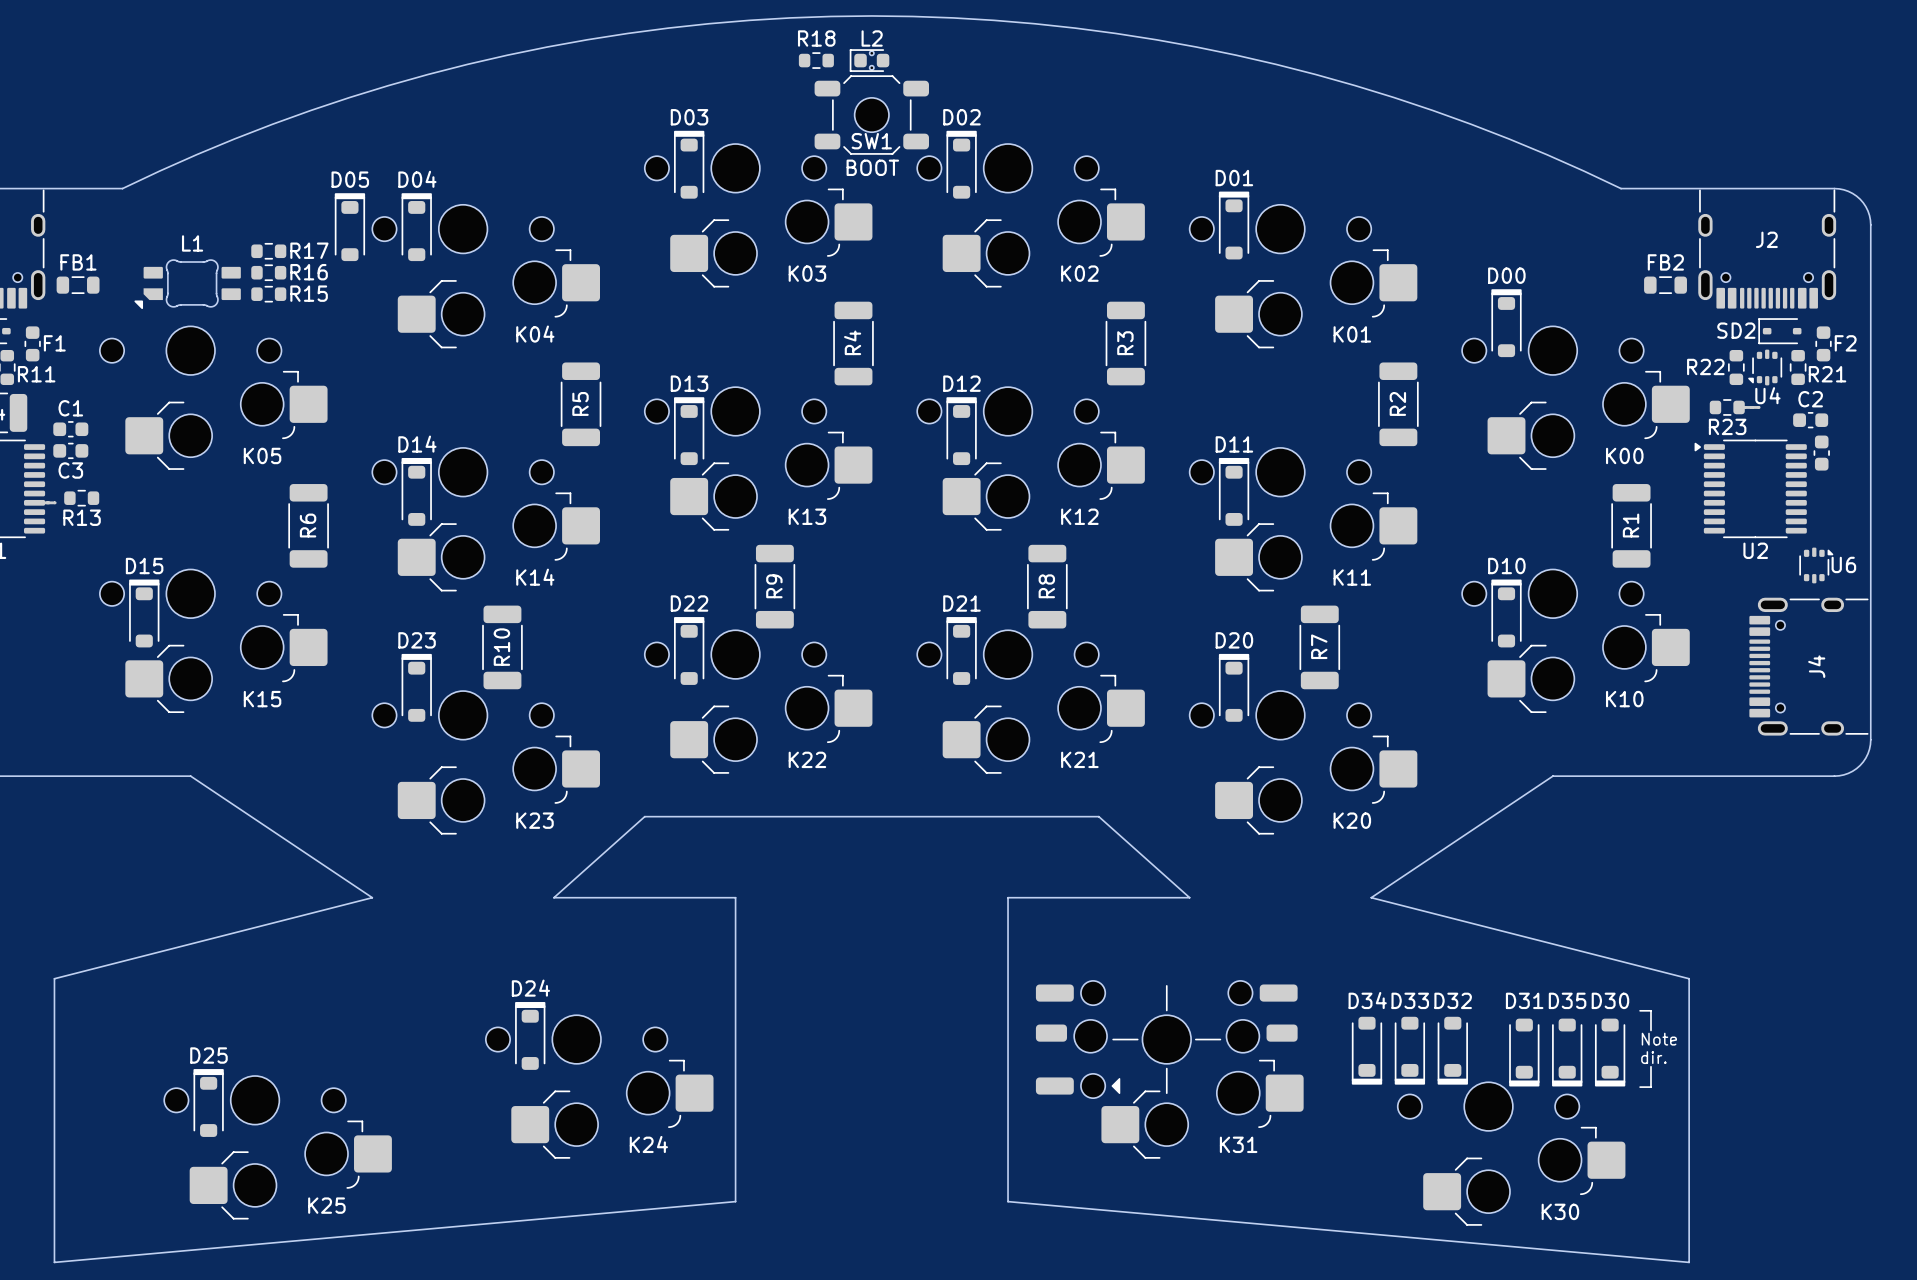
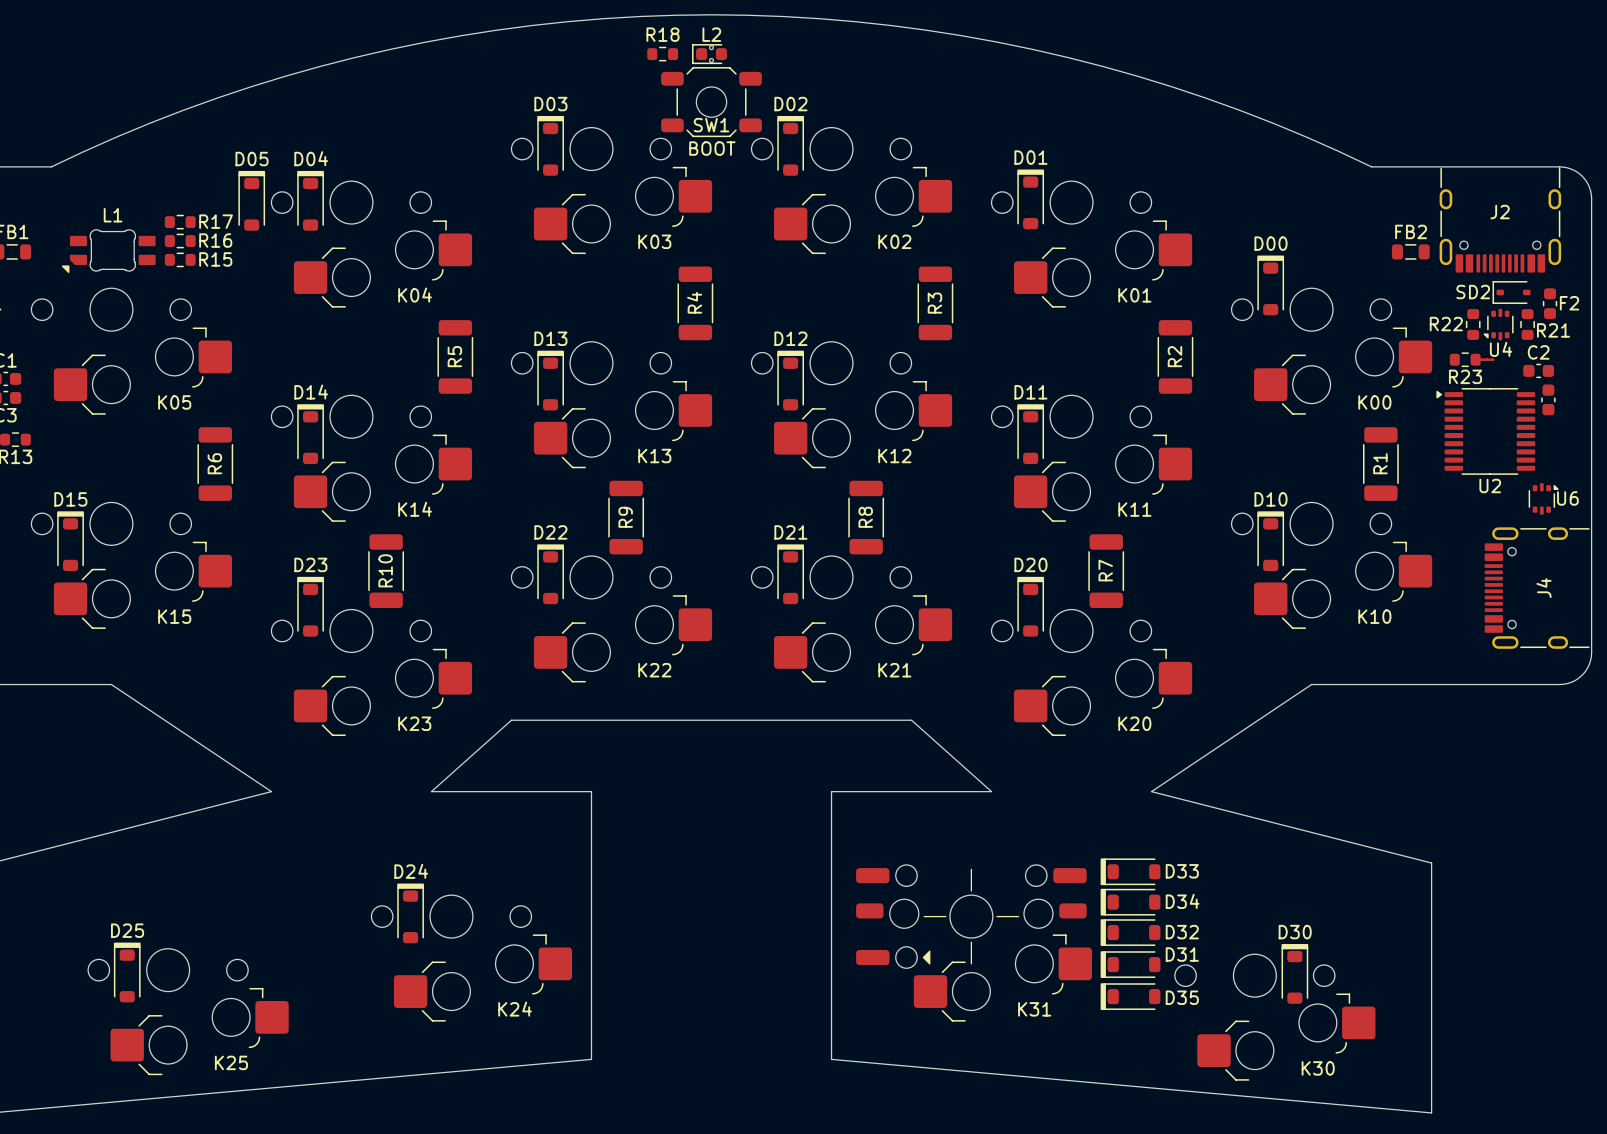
line: (1640, 1010) (1650, 1010) (1650, 1030) -> none
text: Note (1659, 1039) -> none
D34 rotation: 0° (1366, 1050) -> 90° clockwise (1130, 902)
D33 rotation: 0° (1409, 1050) -> 90° clockwise (1130, 871)
D33 position: (1409, 1050) -> (1130, 871)
D32 rotation: 0° (1452, 1050) -> 90° clockwise (1130, 932)
D32 position: (1452, 1050) -> (1130, 932)
D31 rotation: 0° (1524, 1052) -> 90° clockwise (1130, 964)
D31 position: (1524, 1052) -> (1130, 964)
D35 rotation: 0° (1567, 1052) -> 90° clockwise (1130, 996)
D35 position: (1567, 1052) -> (1130, 996)
D30 rotation: 0° (1610, 1052) -> 180° (1294, 973)
D30 position: (1610, 1052) -> (1294, 973)
text: dir. (1653, 1057) -> none
line: (1650, 1066) (1650, 1087) (1640, 1087) -> none

